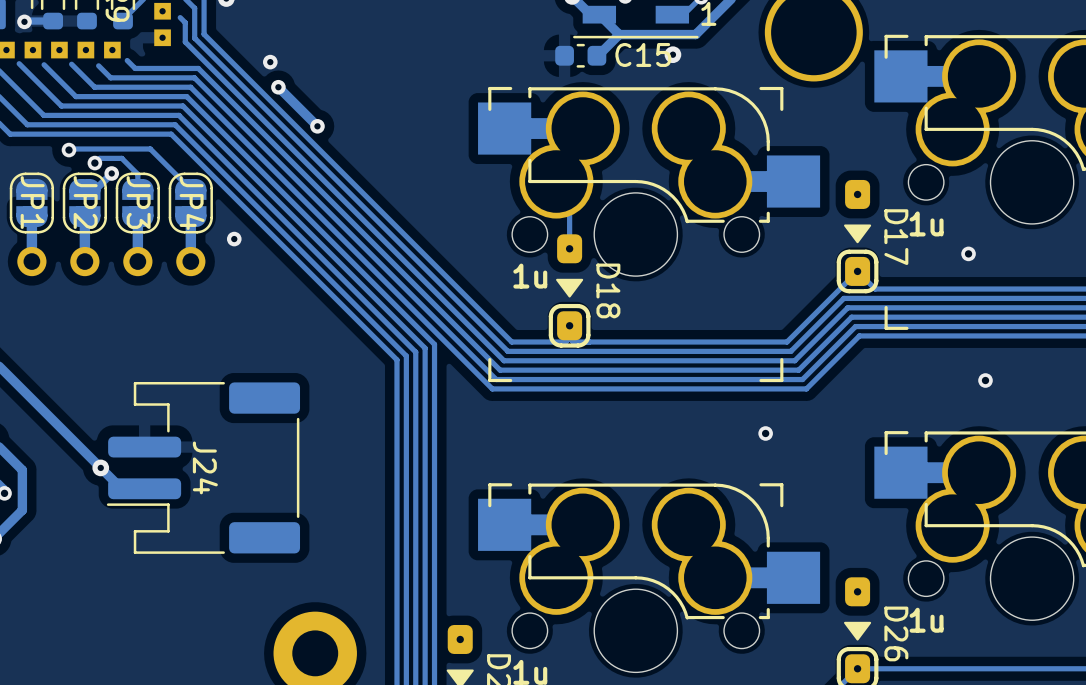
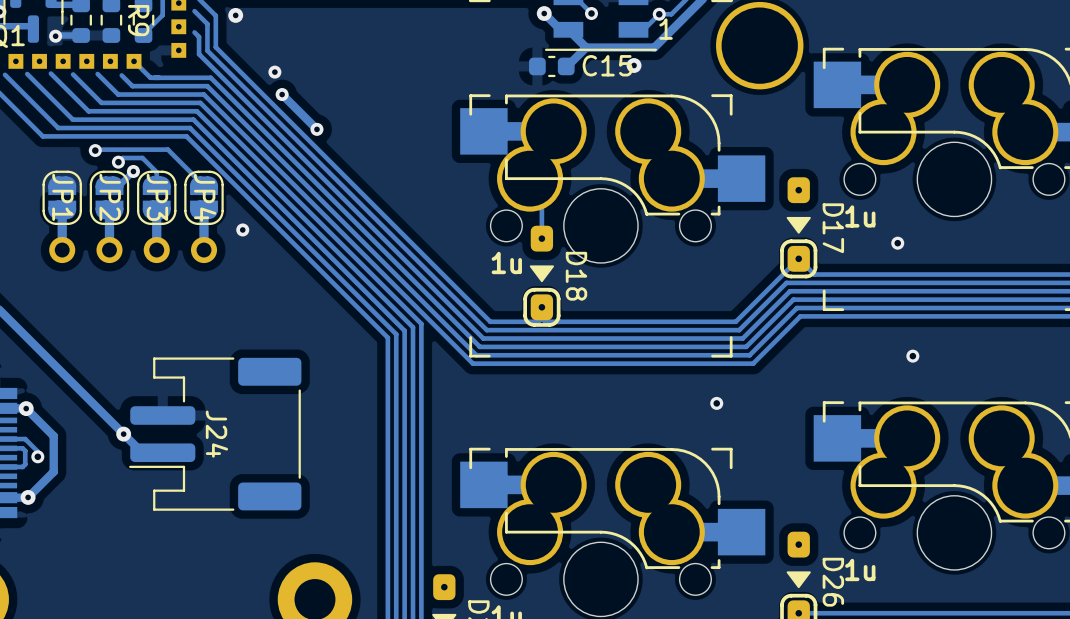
track: (127, 60) (135, 68) -> (134, 61) (150, 77) (154, 77)

